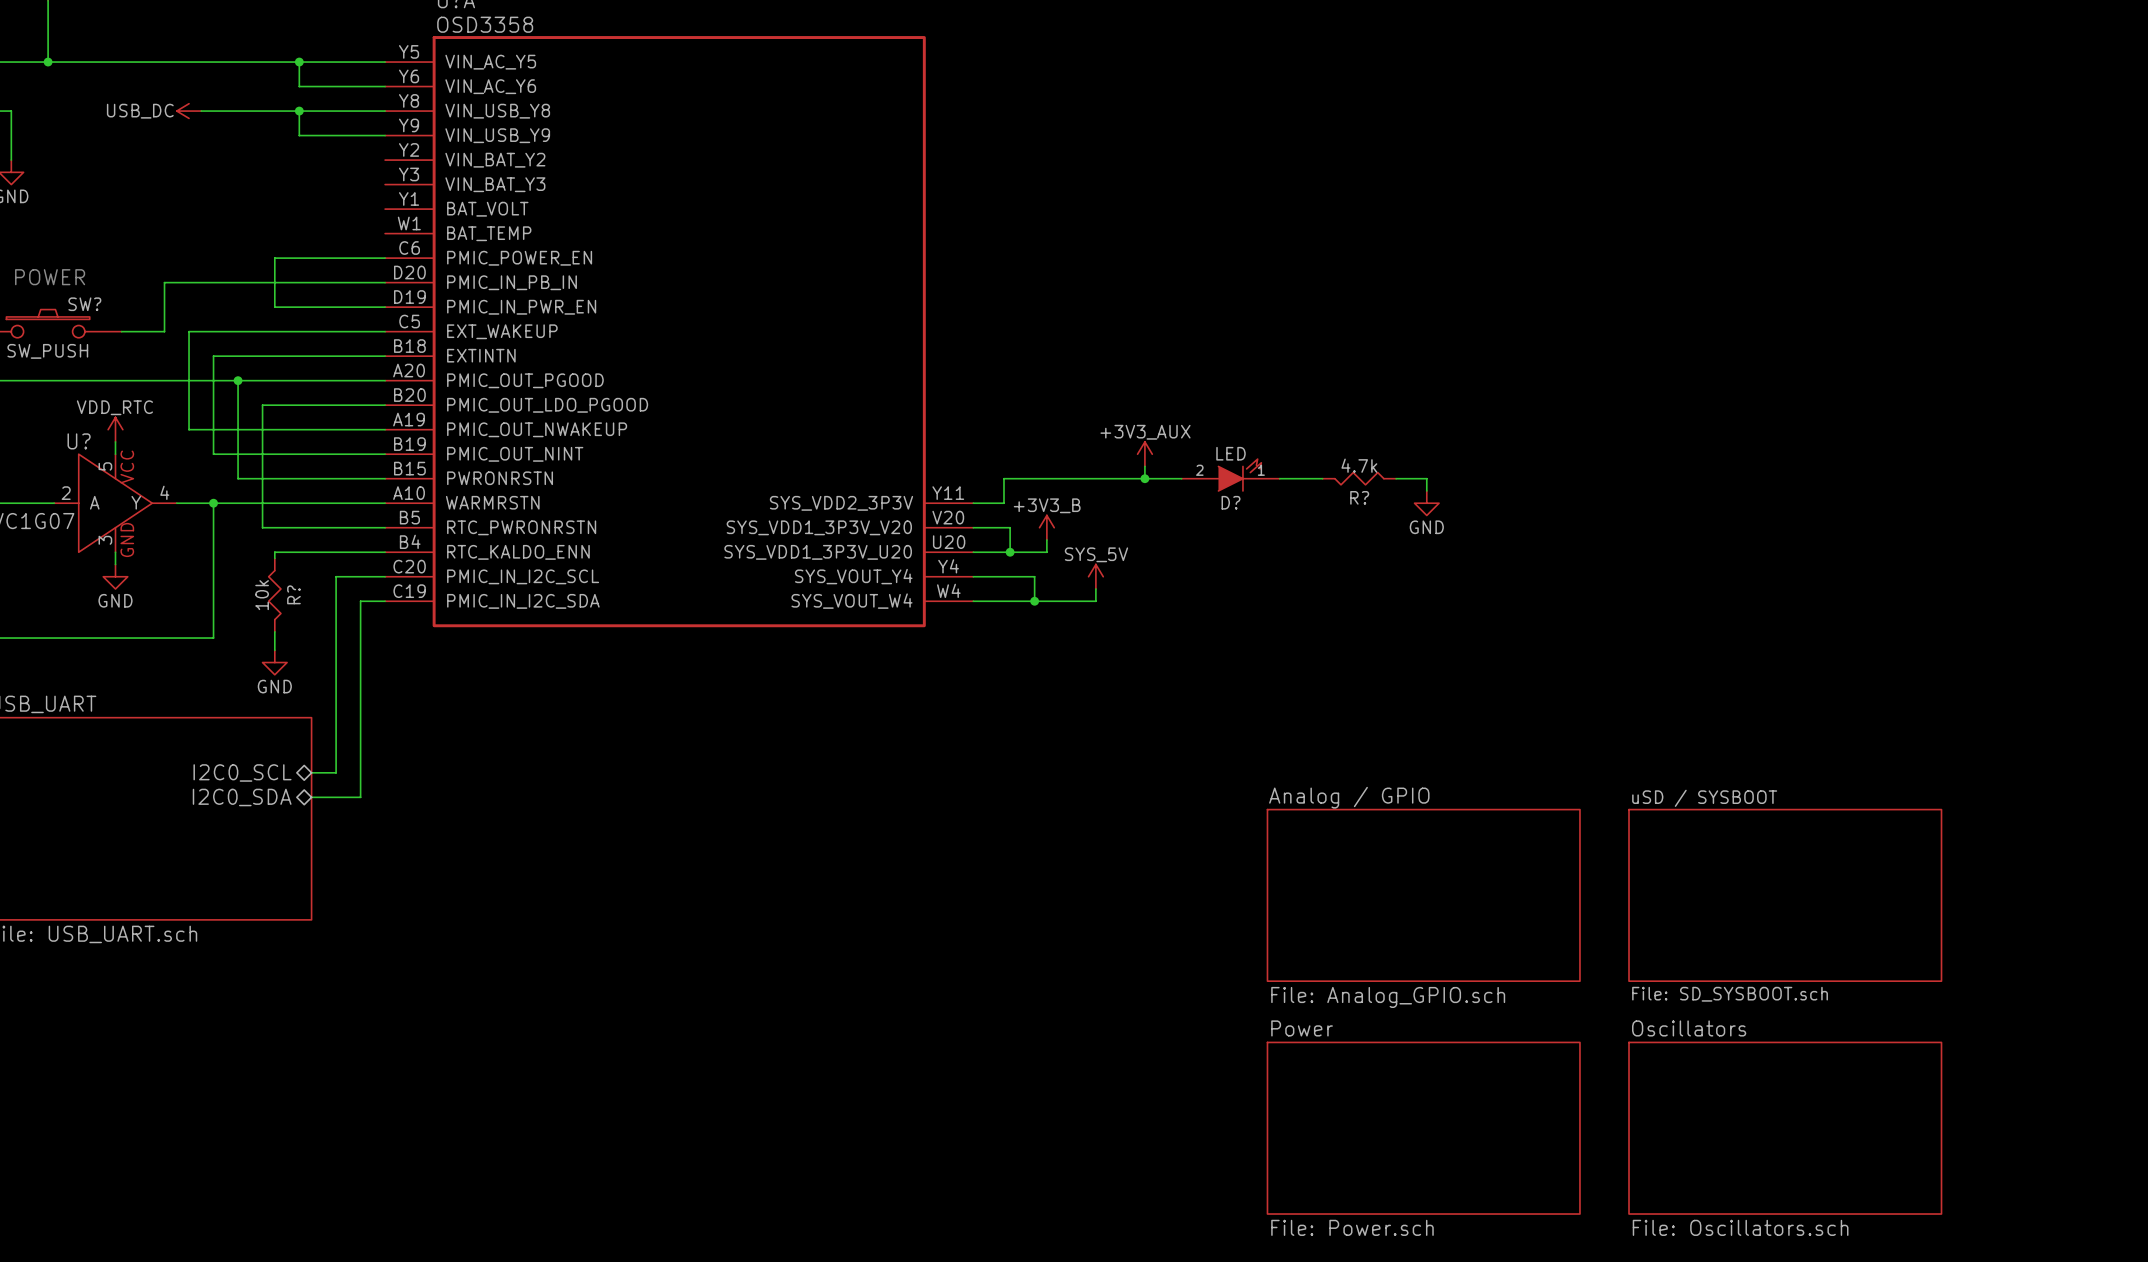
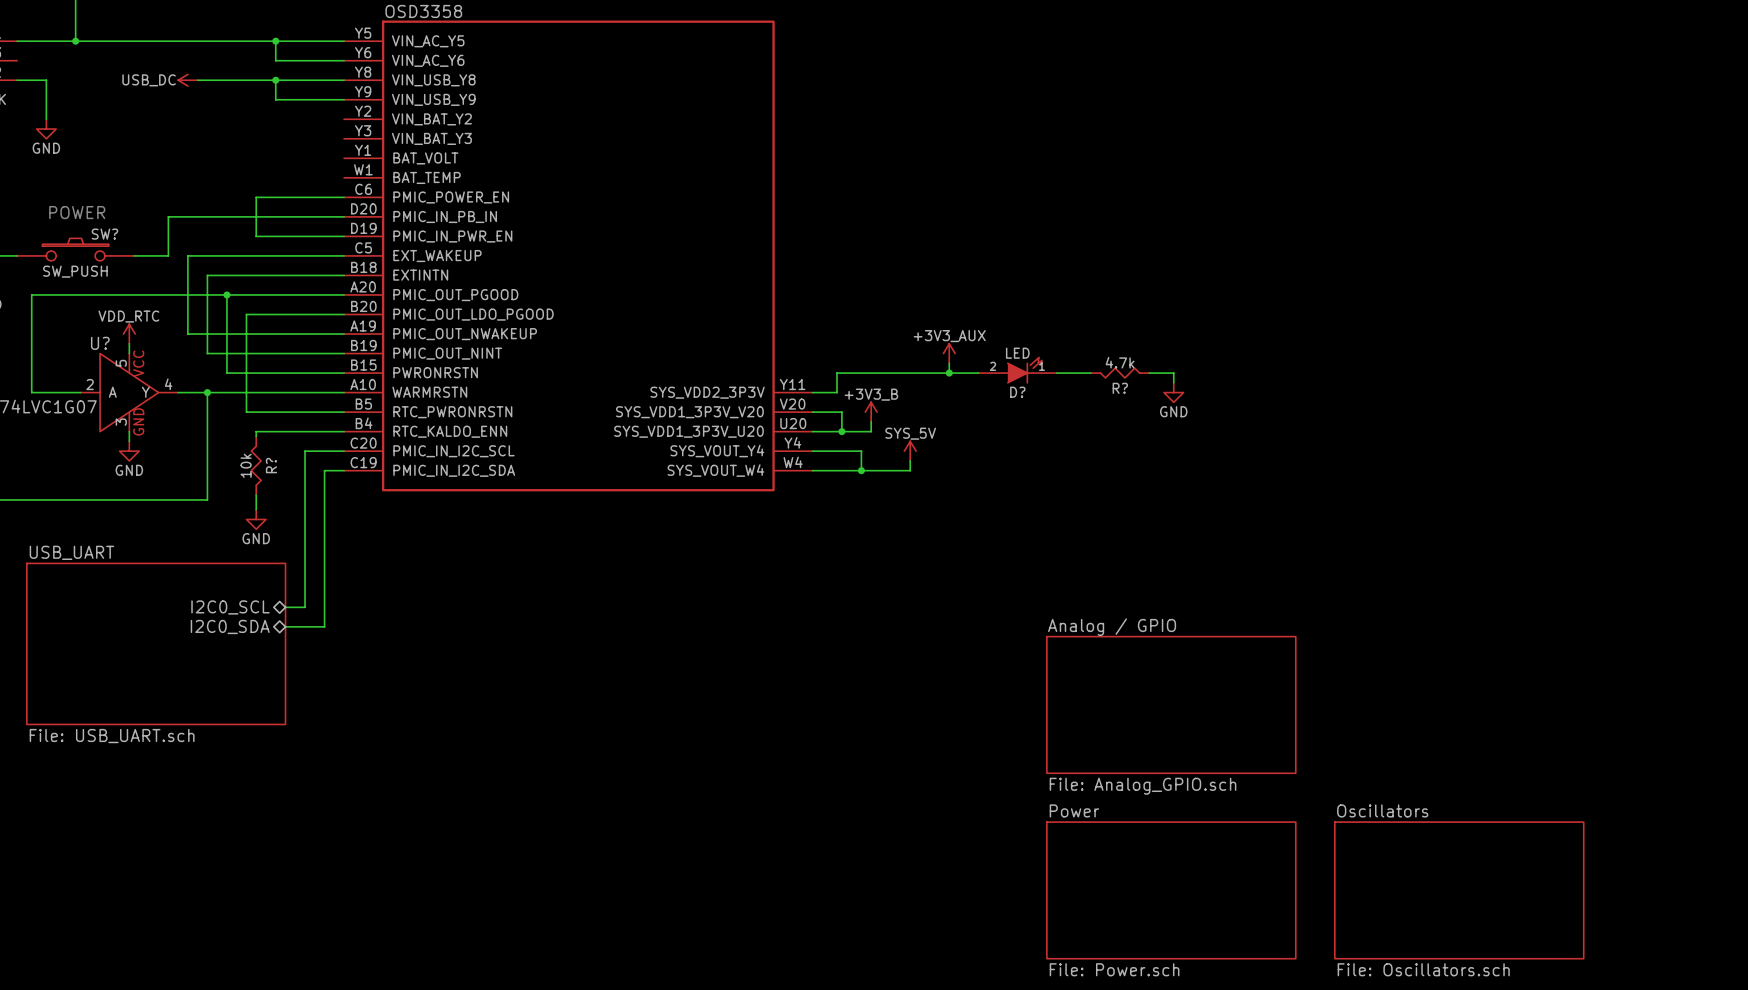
sheet uSD / SYSBOOT: File: SD_SYSBOOT.sch (1785, 895) -> none

